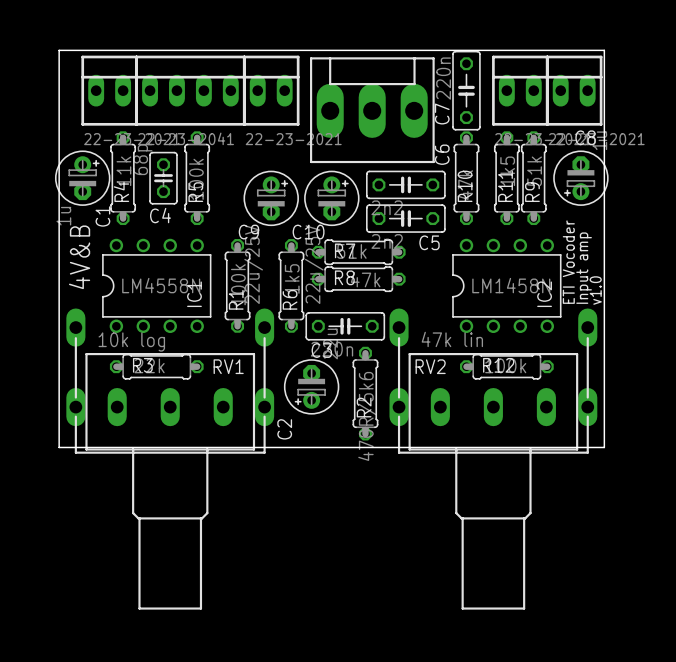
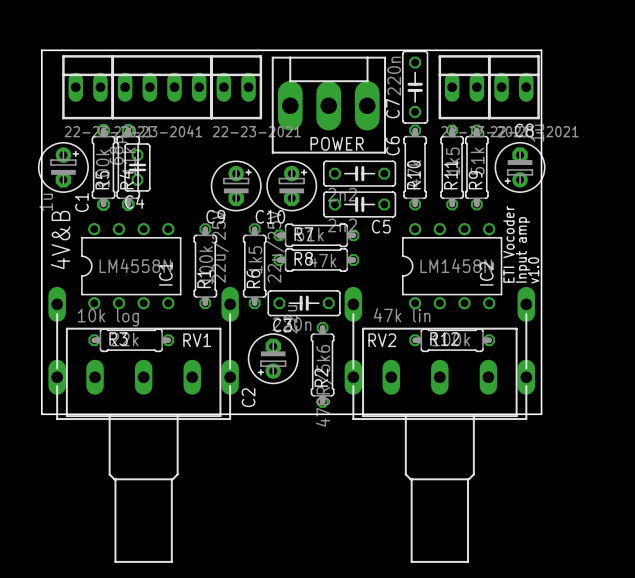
R4 footprint: [110, 131, 137, 226] -> [116, 124, 141, 211]
R5 footprint: [184, 131, 211, 226] -> [91, 124, 116, 211]
POWER name: none -> POWER (337, 143)

